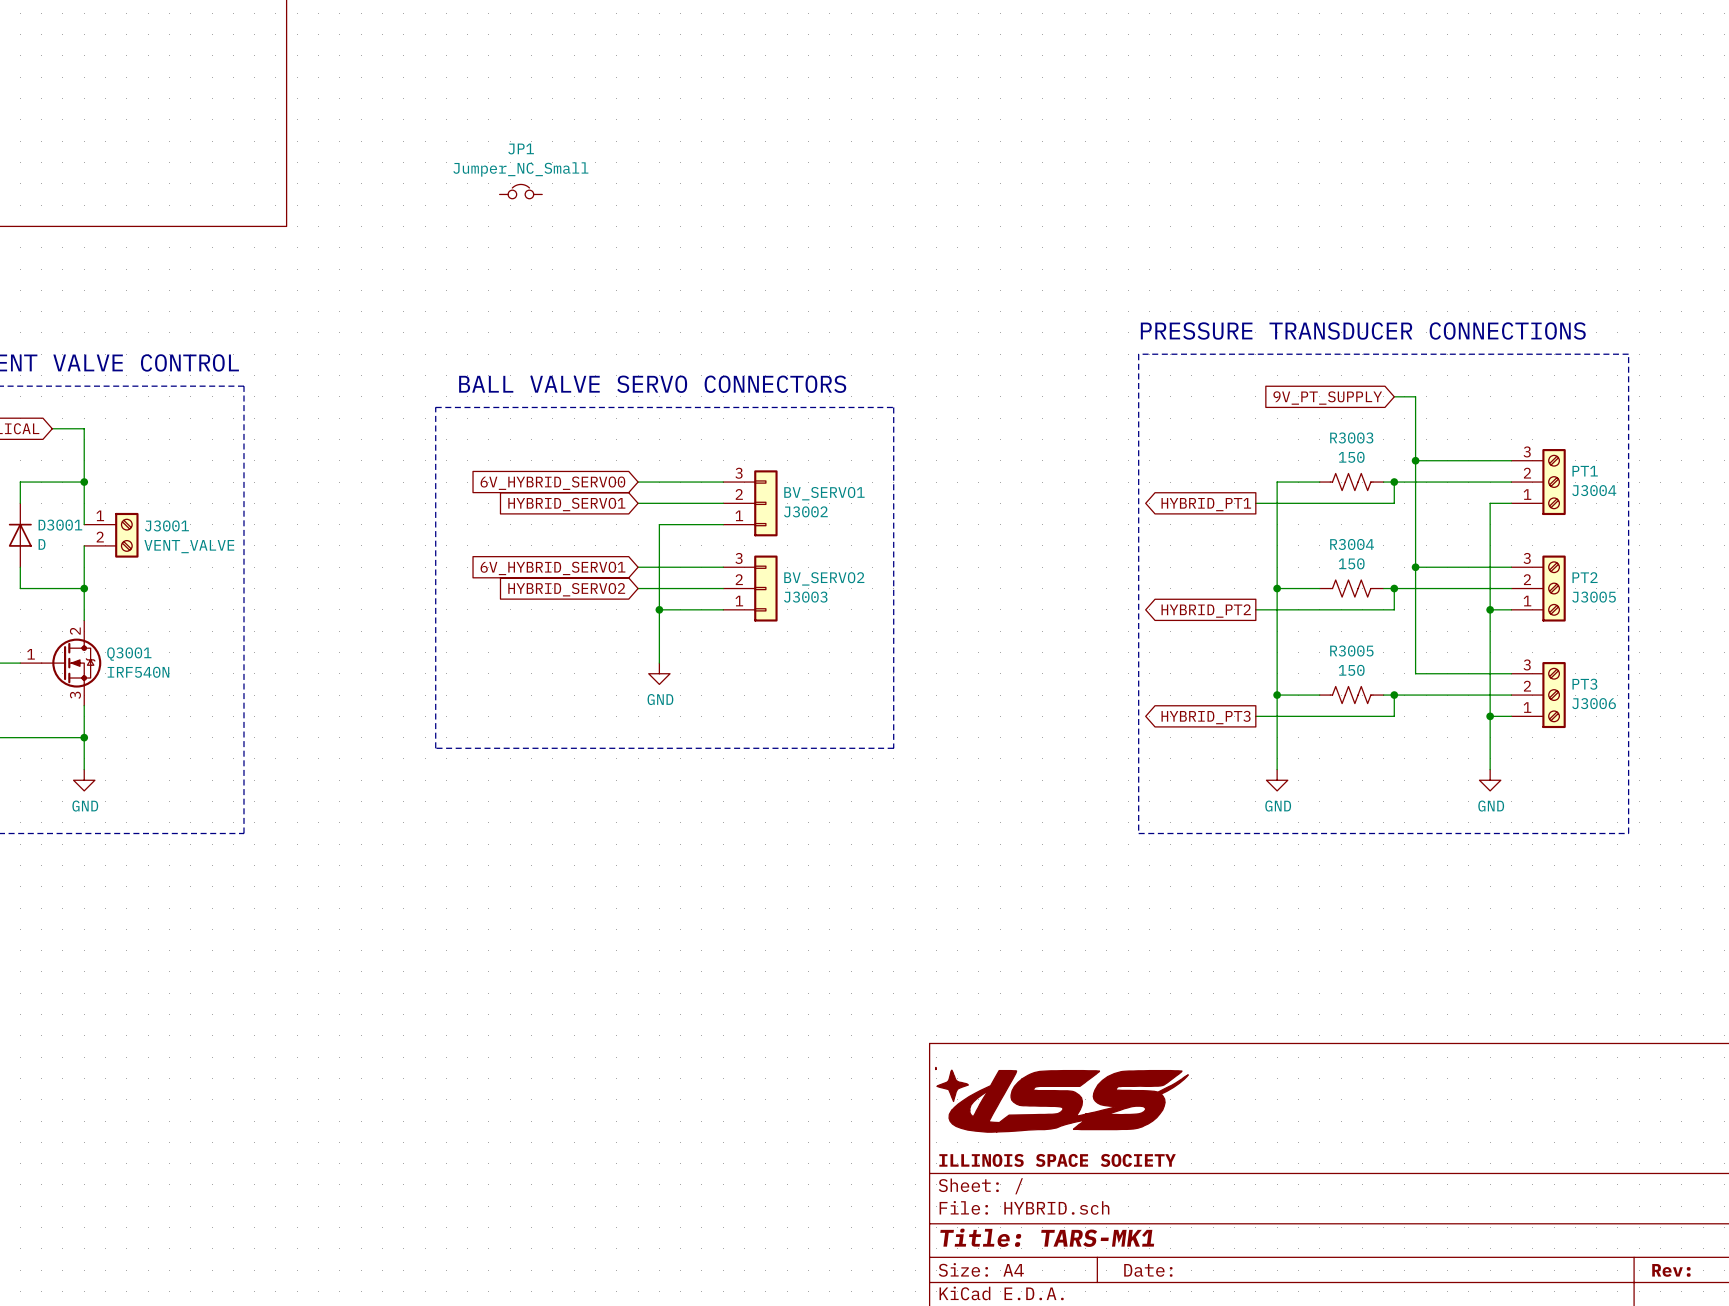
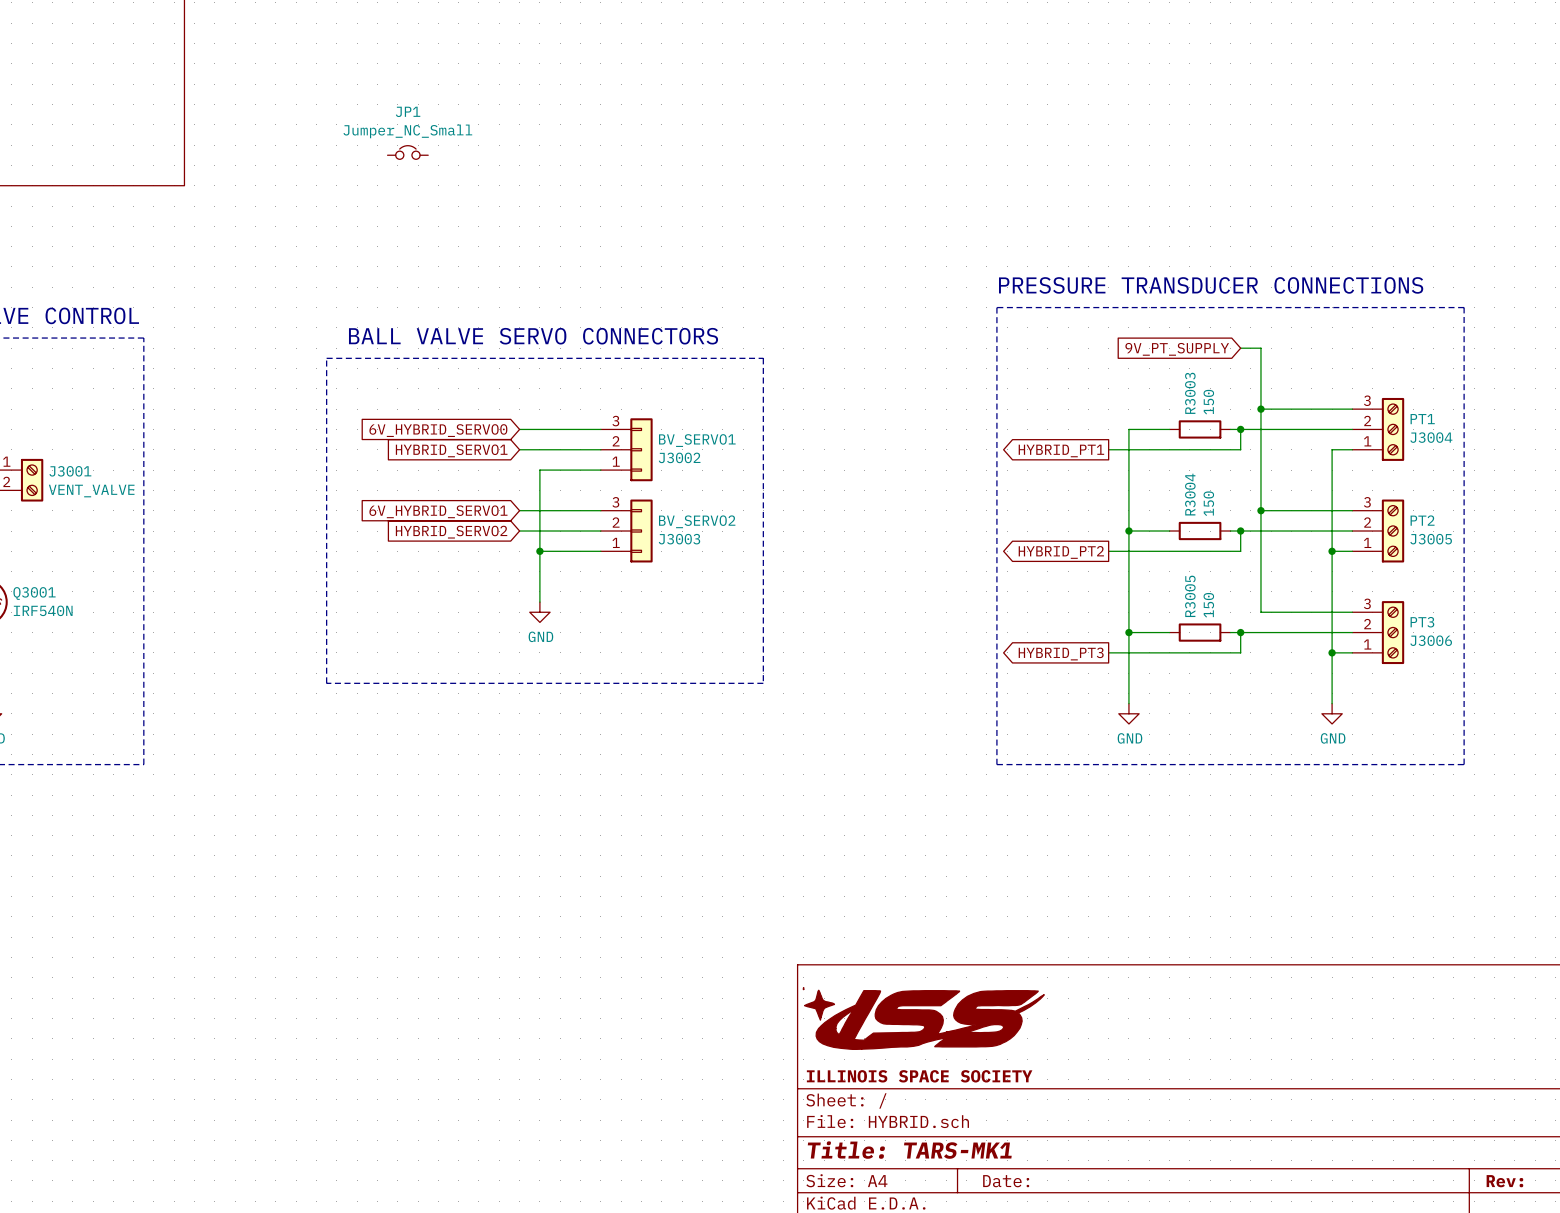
R3003 symbol: [1319, 473, 1384, 491] -> [1169, 420, 1231, 439]
R3004 symbol: [1319, 580, 1384, 598] -> [1169, 521, 1231, 541]
R3005 symbol: [1319, 686, 1384, 704] -> [1169, 623, 1231, 642]

